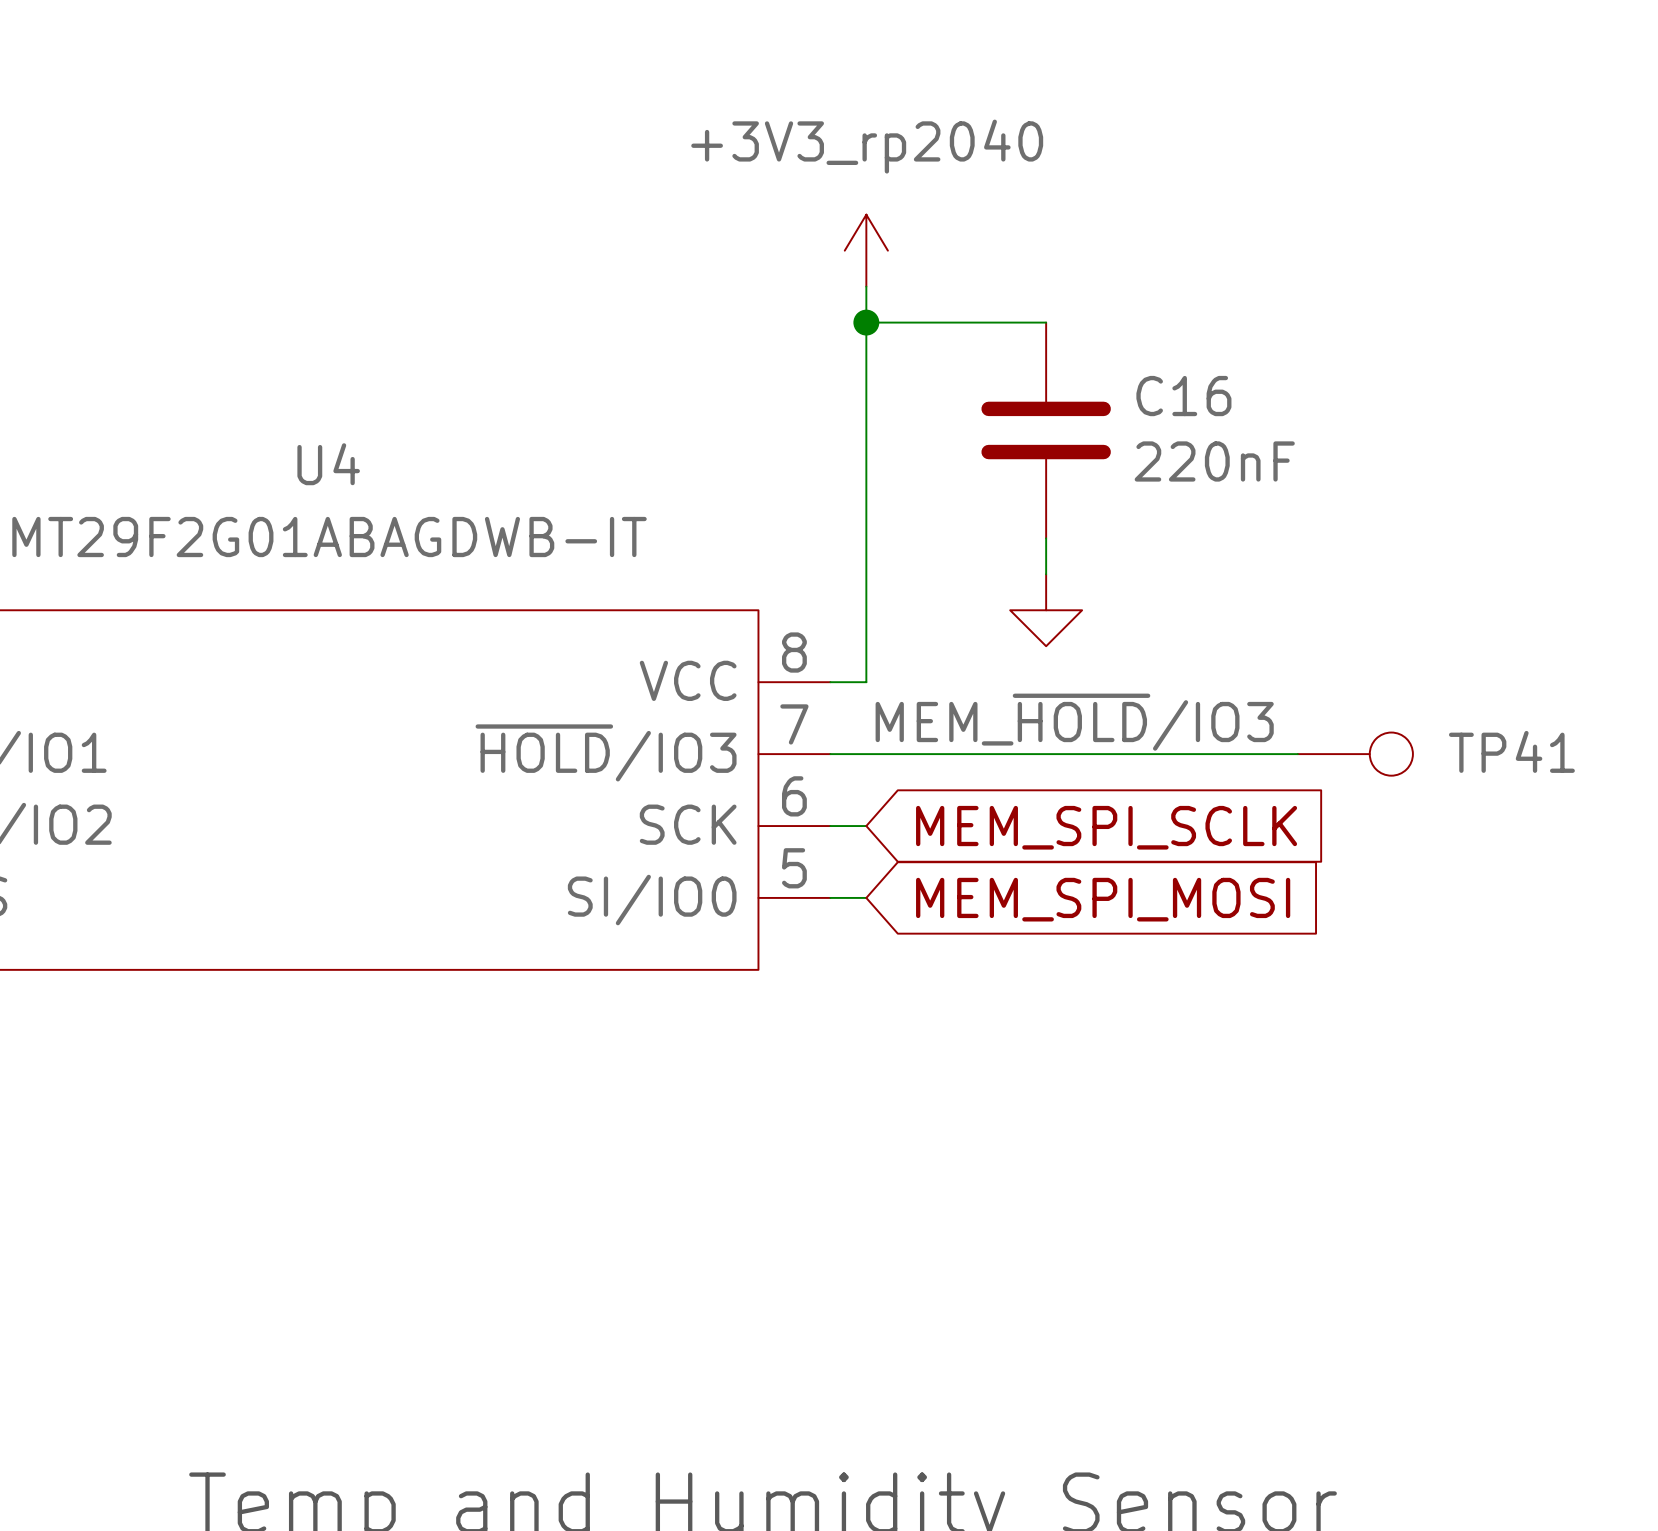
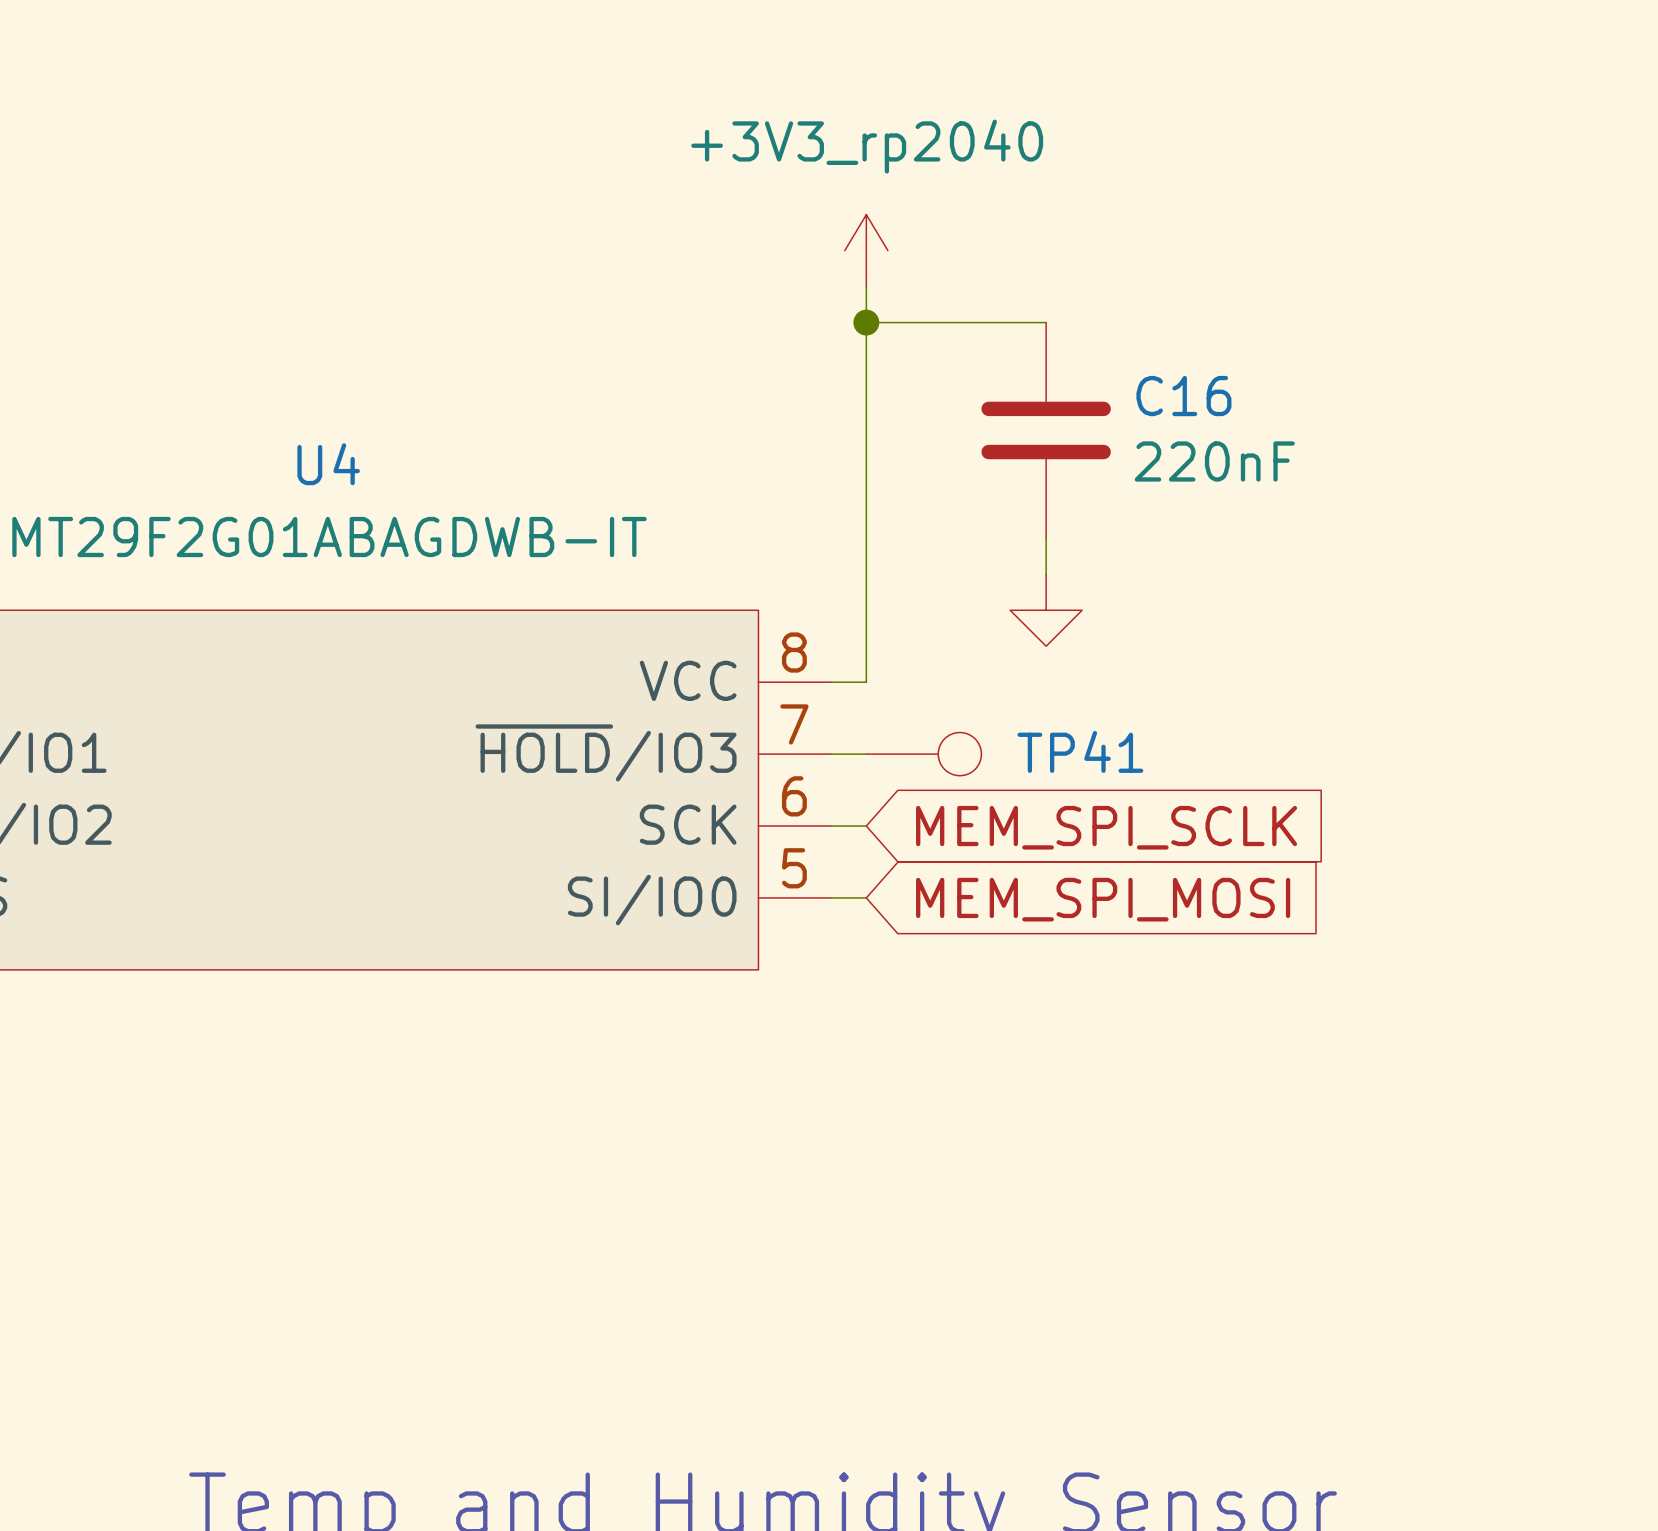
label: MEM_~{HOLD}/IO3 (1074, 722) -> none
wire: (866, 754) (1297, 754) -> none
TP41 position: (1355, 754) -> (923, 754)

